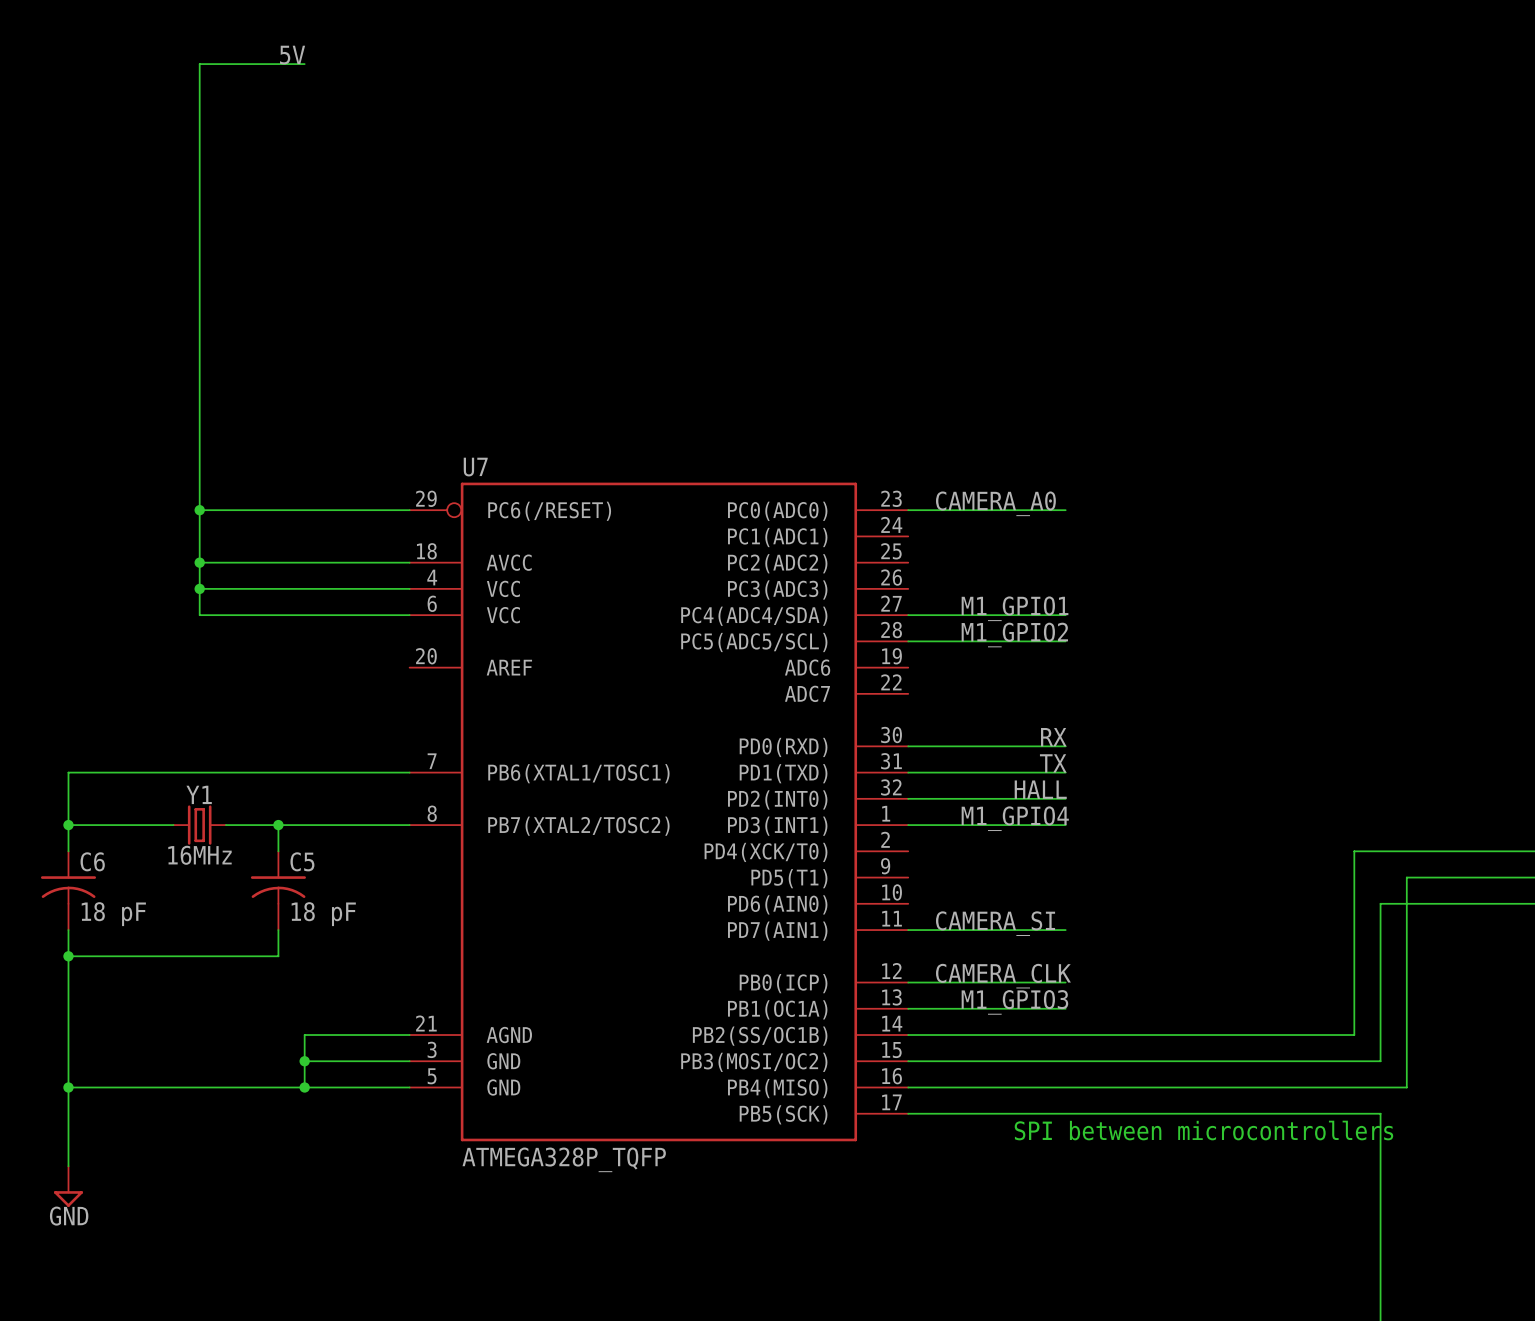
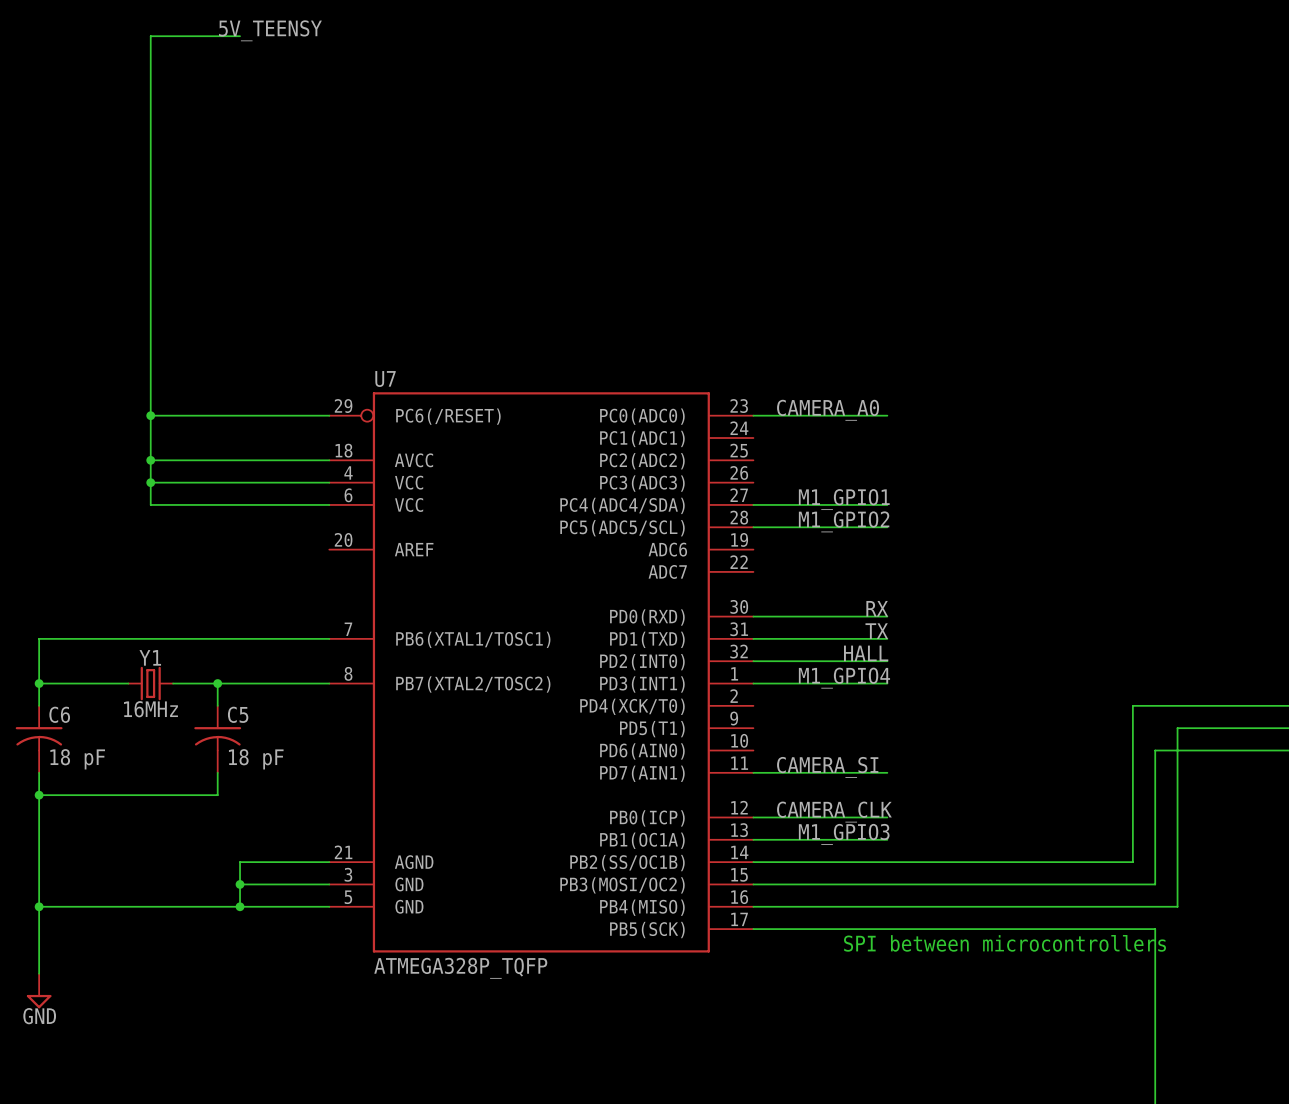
label: 5V (292, 55) -> 5V_TEENSY (270, 30)

